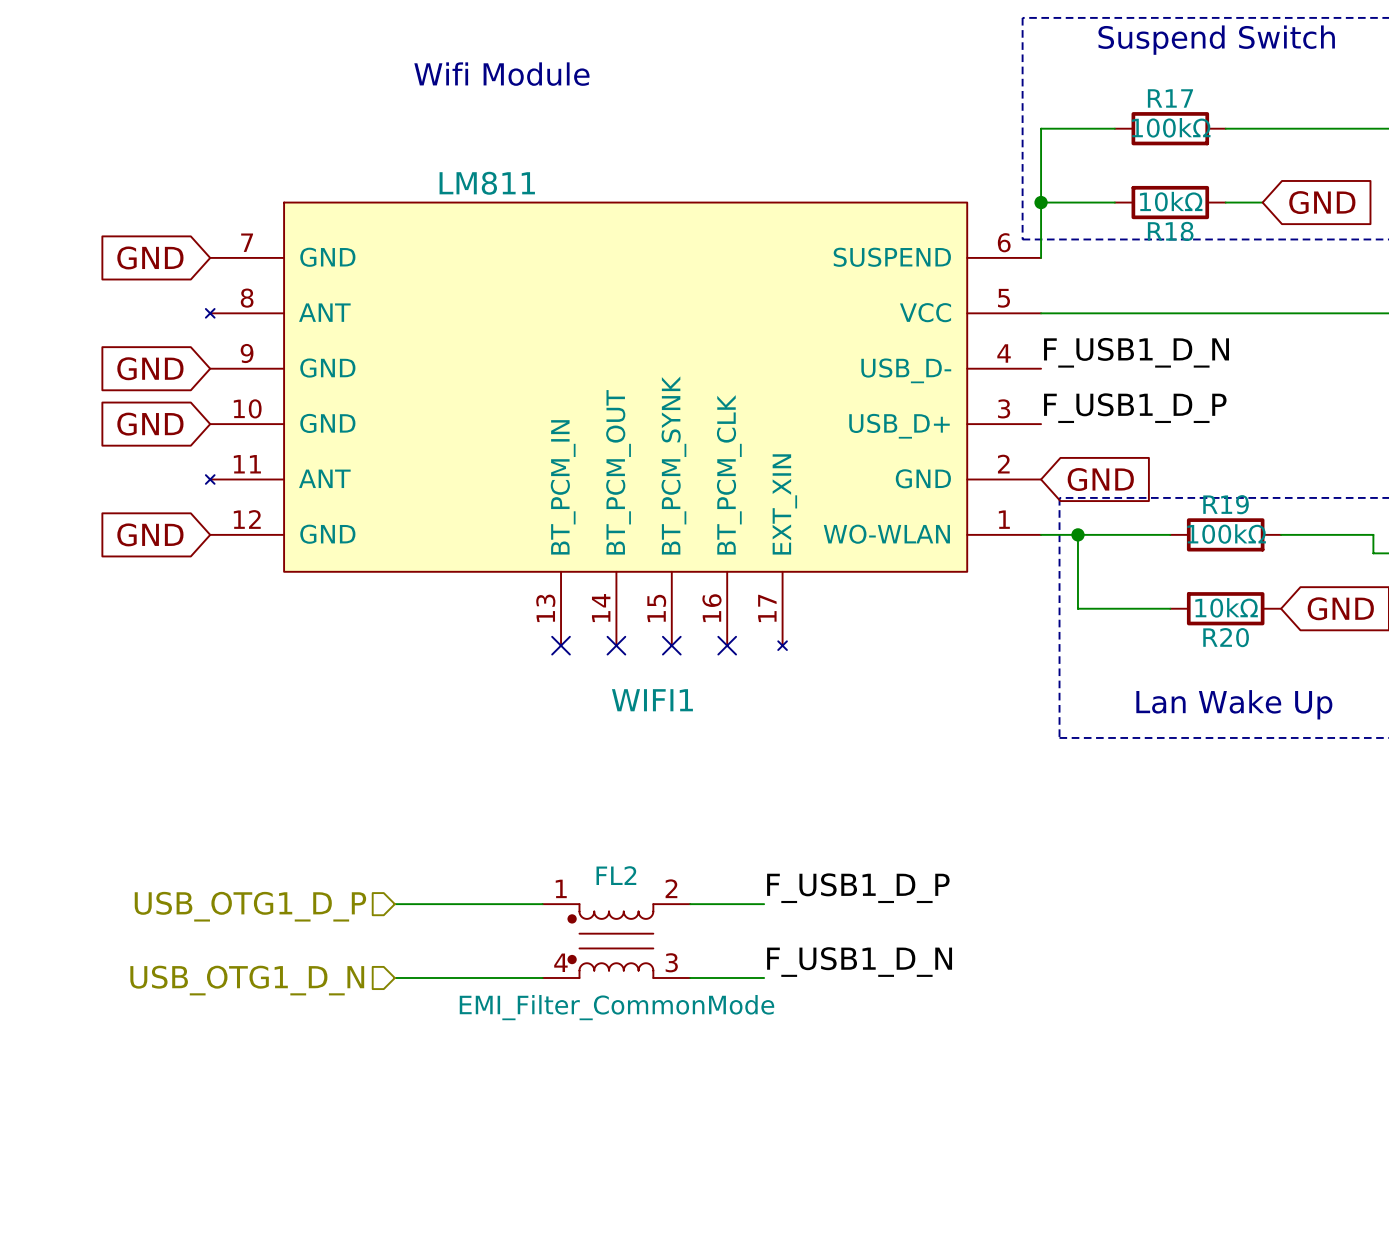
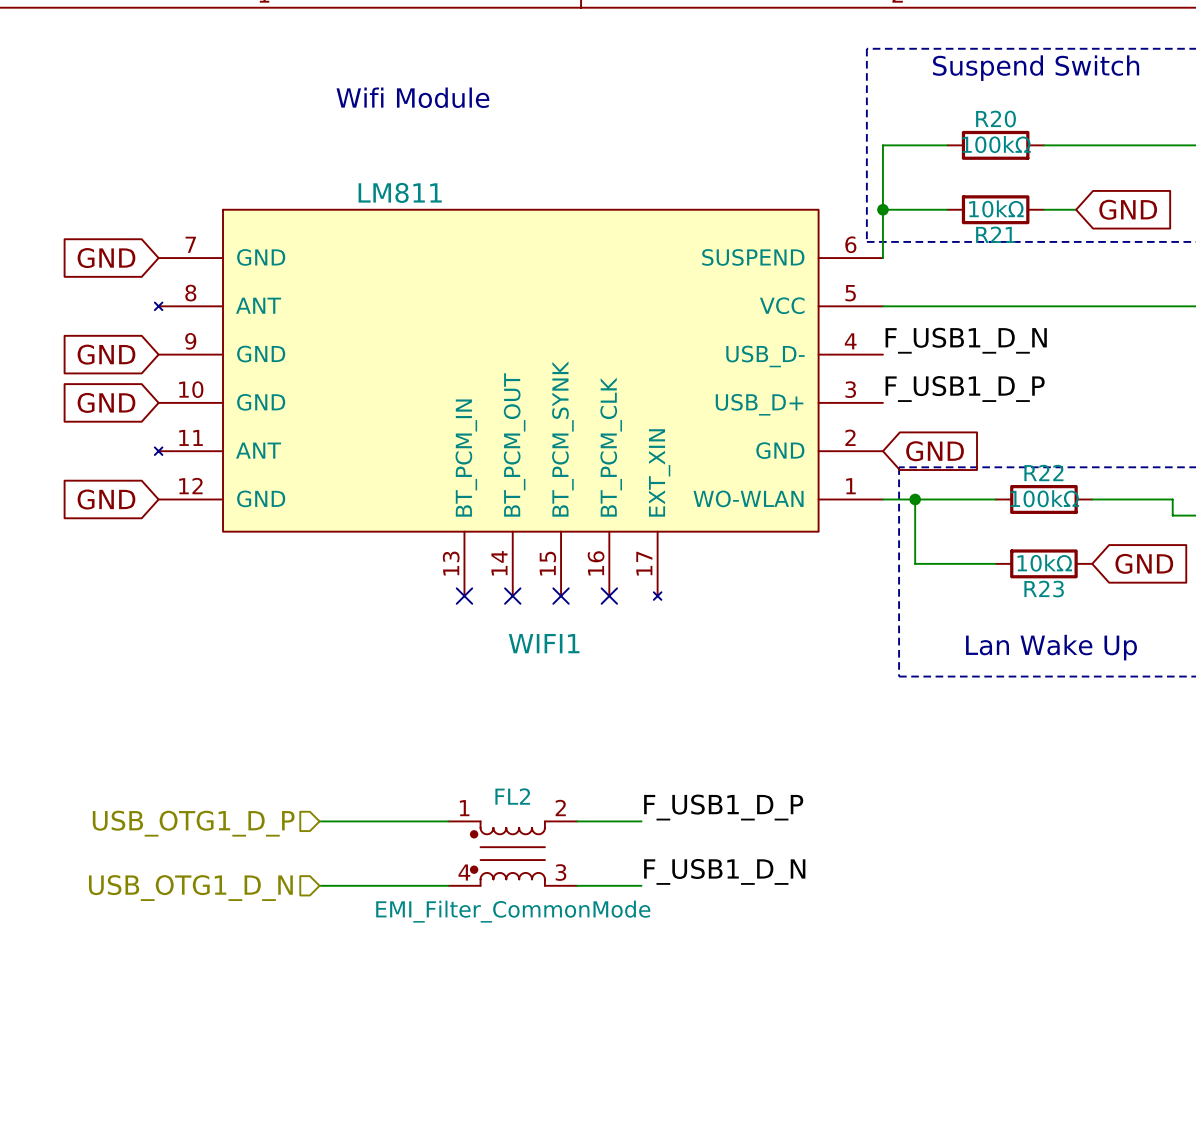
R17 name: R17 (1170, 98) -> R20 (996, 119)
R18 name: R18 (1170, 231) -> R21 (995, 234)
R19 name: R19 (1226, 504) -> R22 (1043, 472)
R20 name: R20 (1226, 637) -> R23 (1044, 589)

